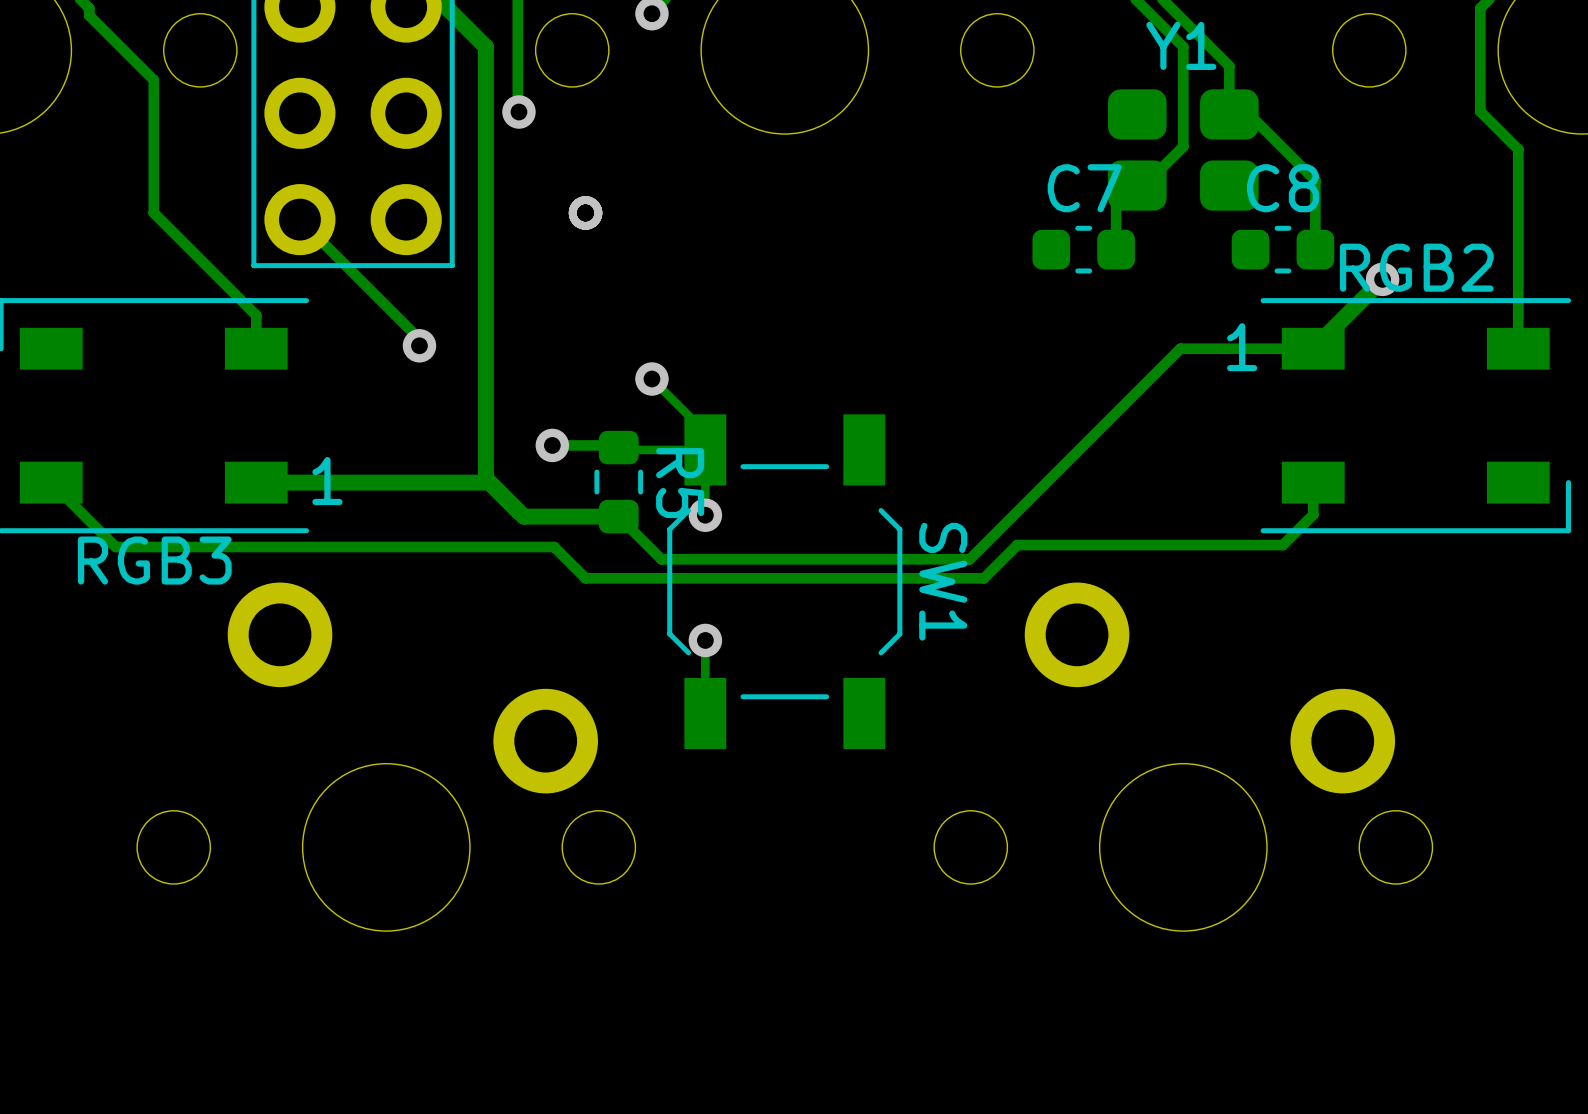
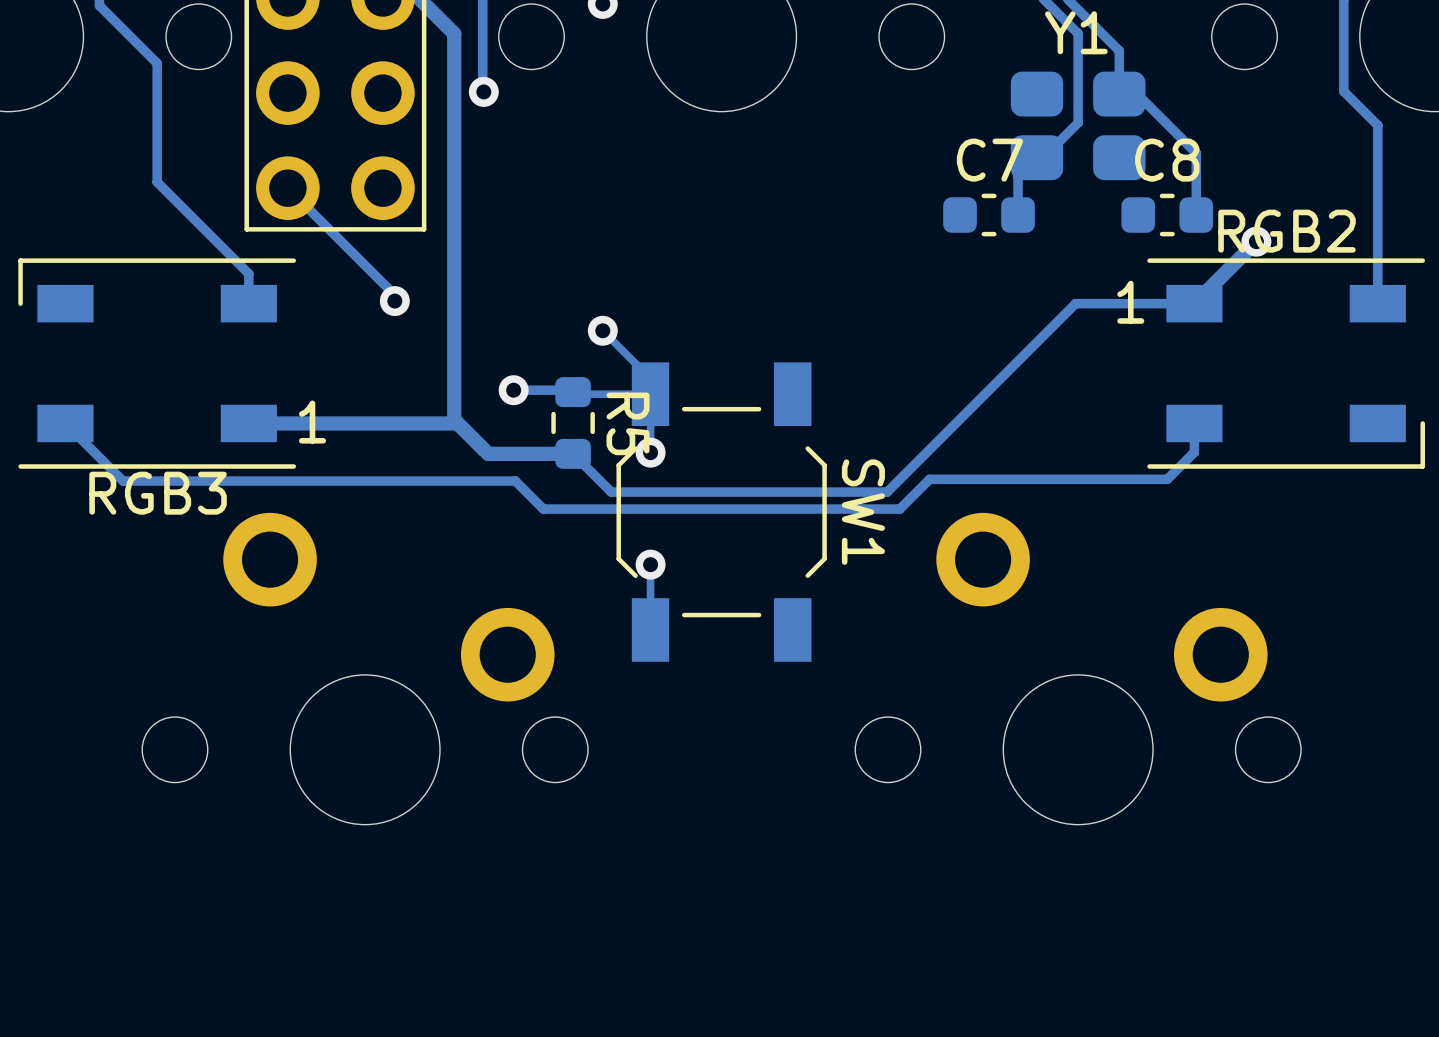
via: (585, 212) -> none

